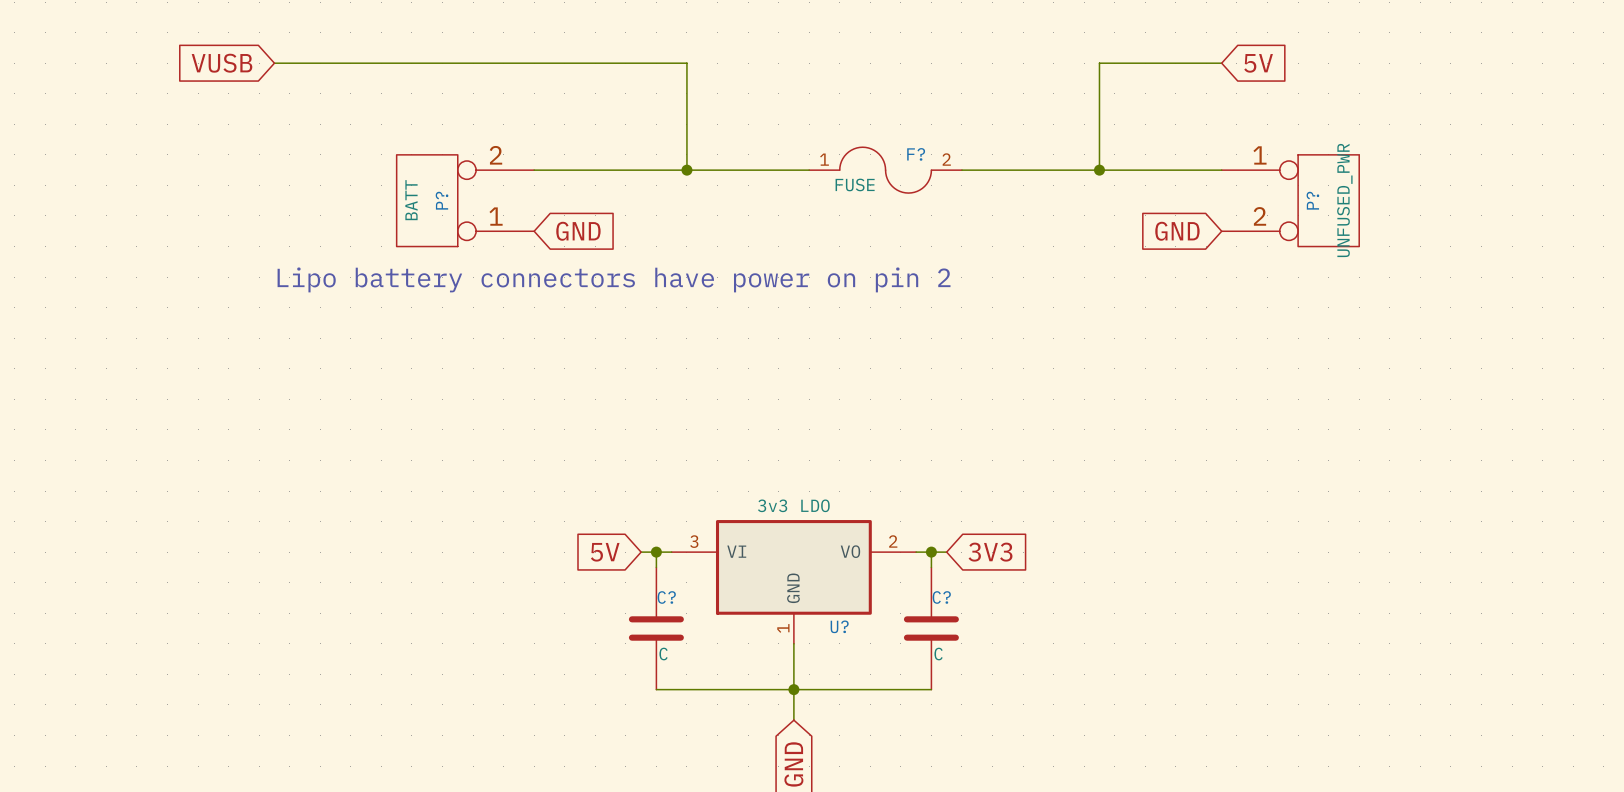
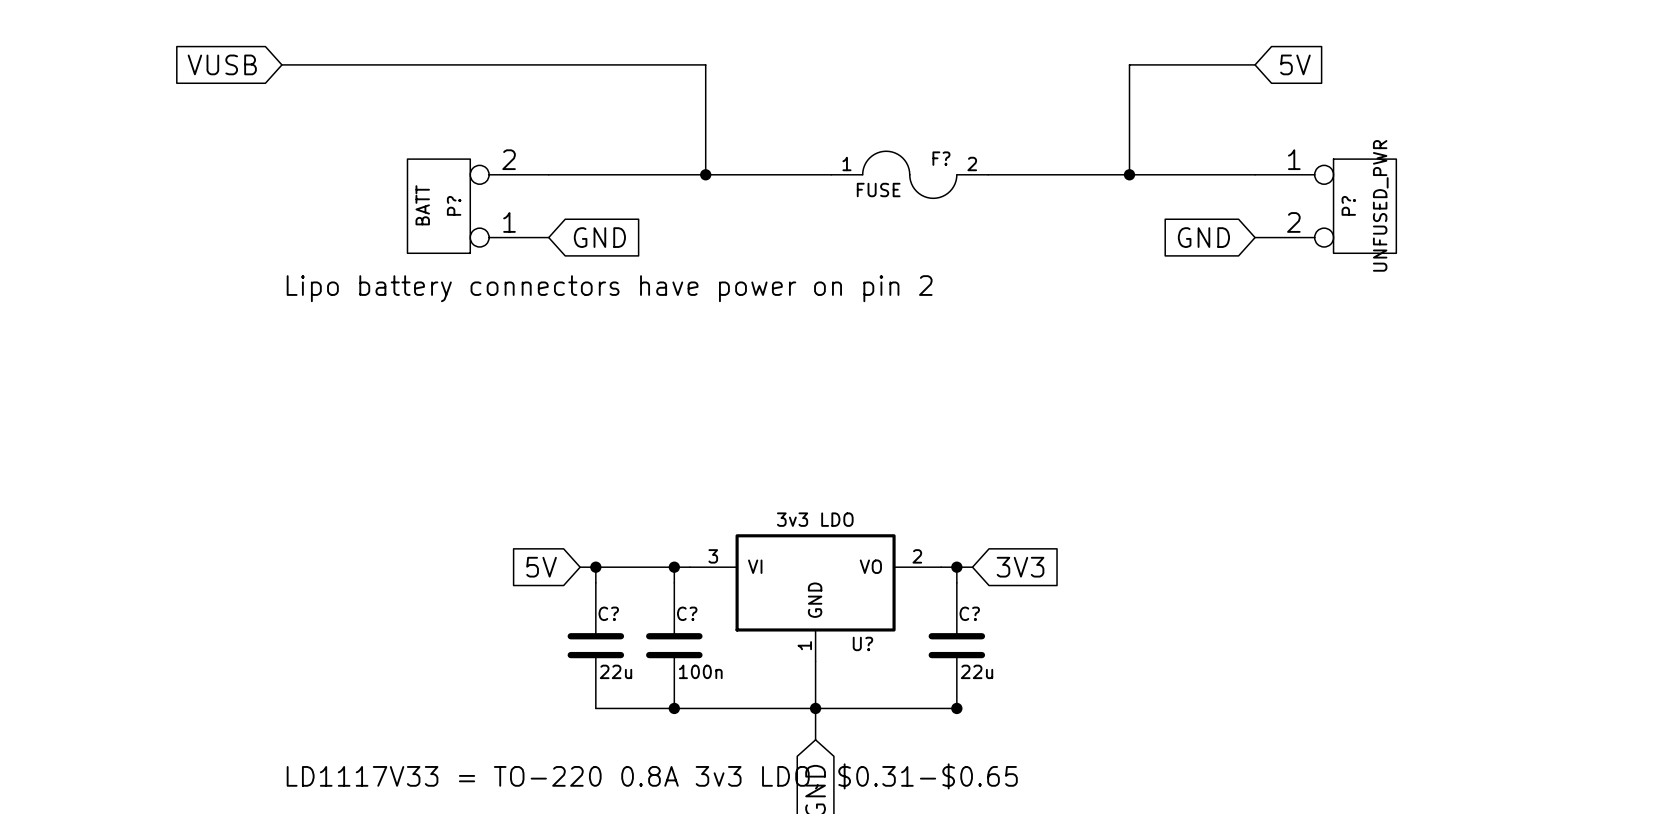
wire: none -> (580, 567) (658, 567)
wire: none -> (595, 567) (595, 582)
junction: none -> (595, 567)
global label position: 5V (605, 552) -> 5V (541, 567)
C?: none -> 22u (595, 645)
C? value: C (663, 654) -> 100n (700, 671)
C? value: C (938, 654) -> 22u (977, 671)
wire: none -> (595, 708) (674, 708)
junction: none -> (674, 708)
junction: none -> (956, 708)
text: none -> LD1117V33 = TO-220 0.8A 3v3 LDO, $0.31-$0.65 (652, 776)

